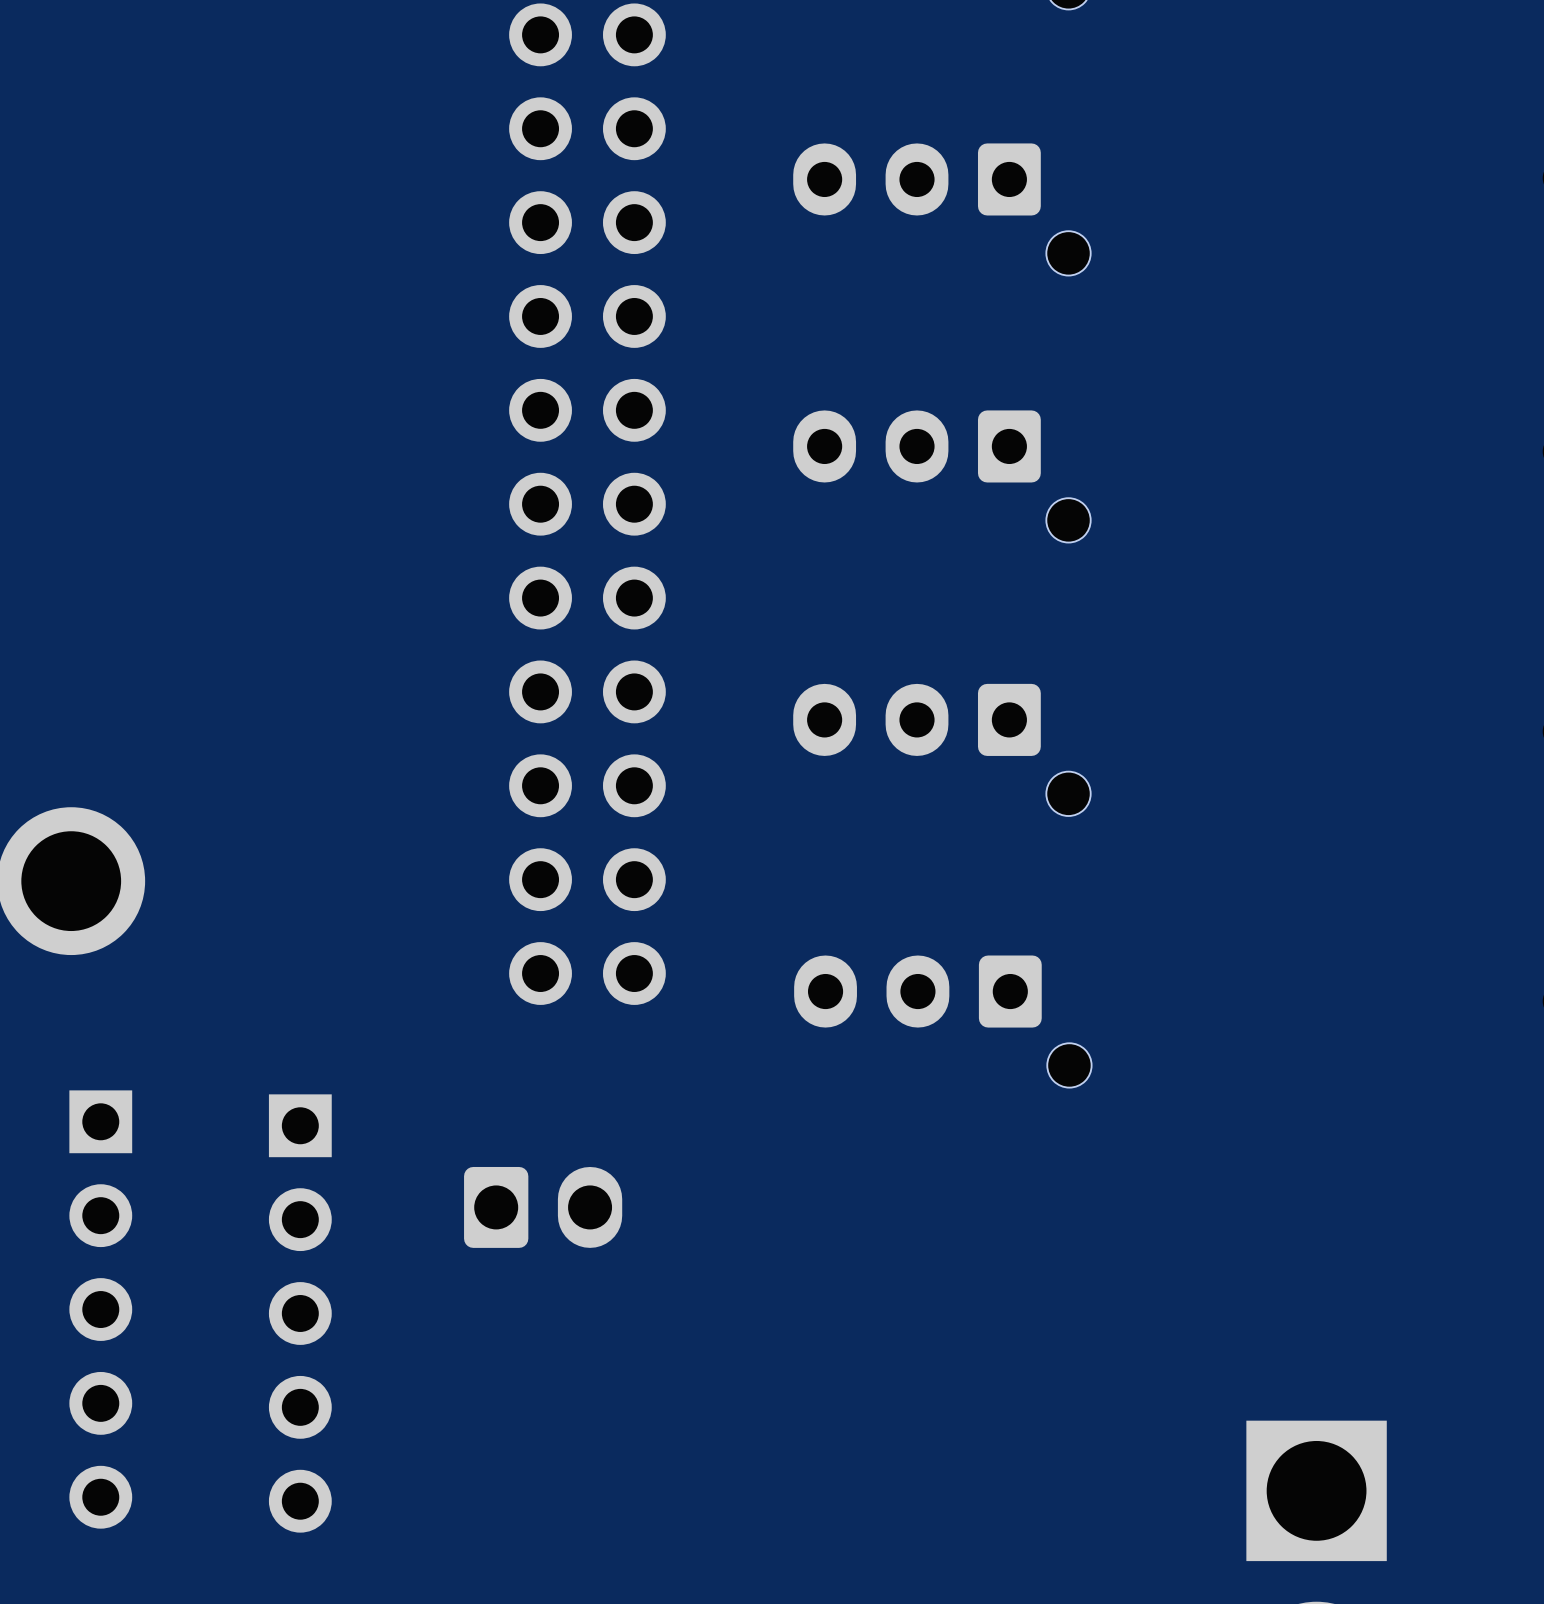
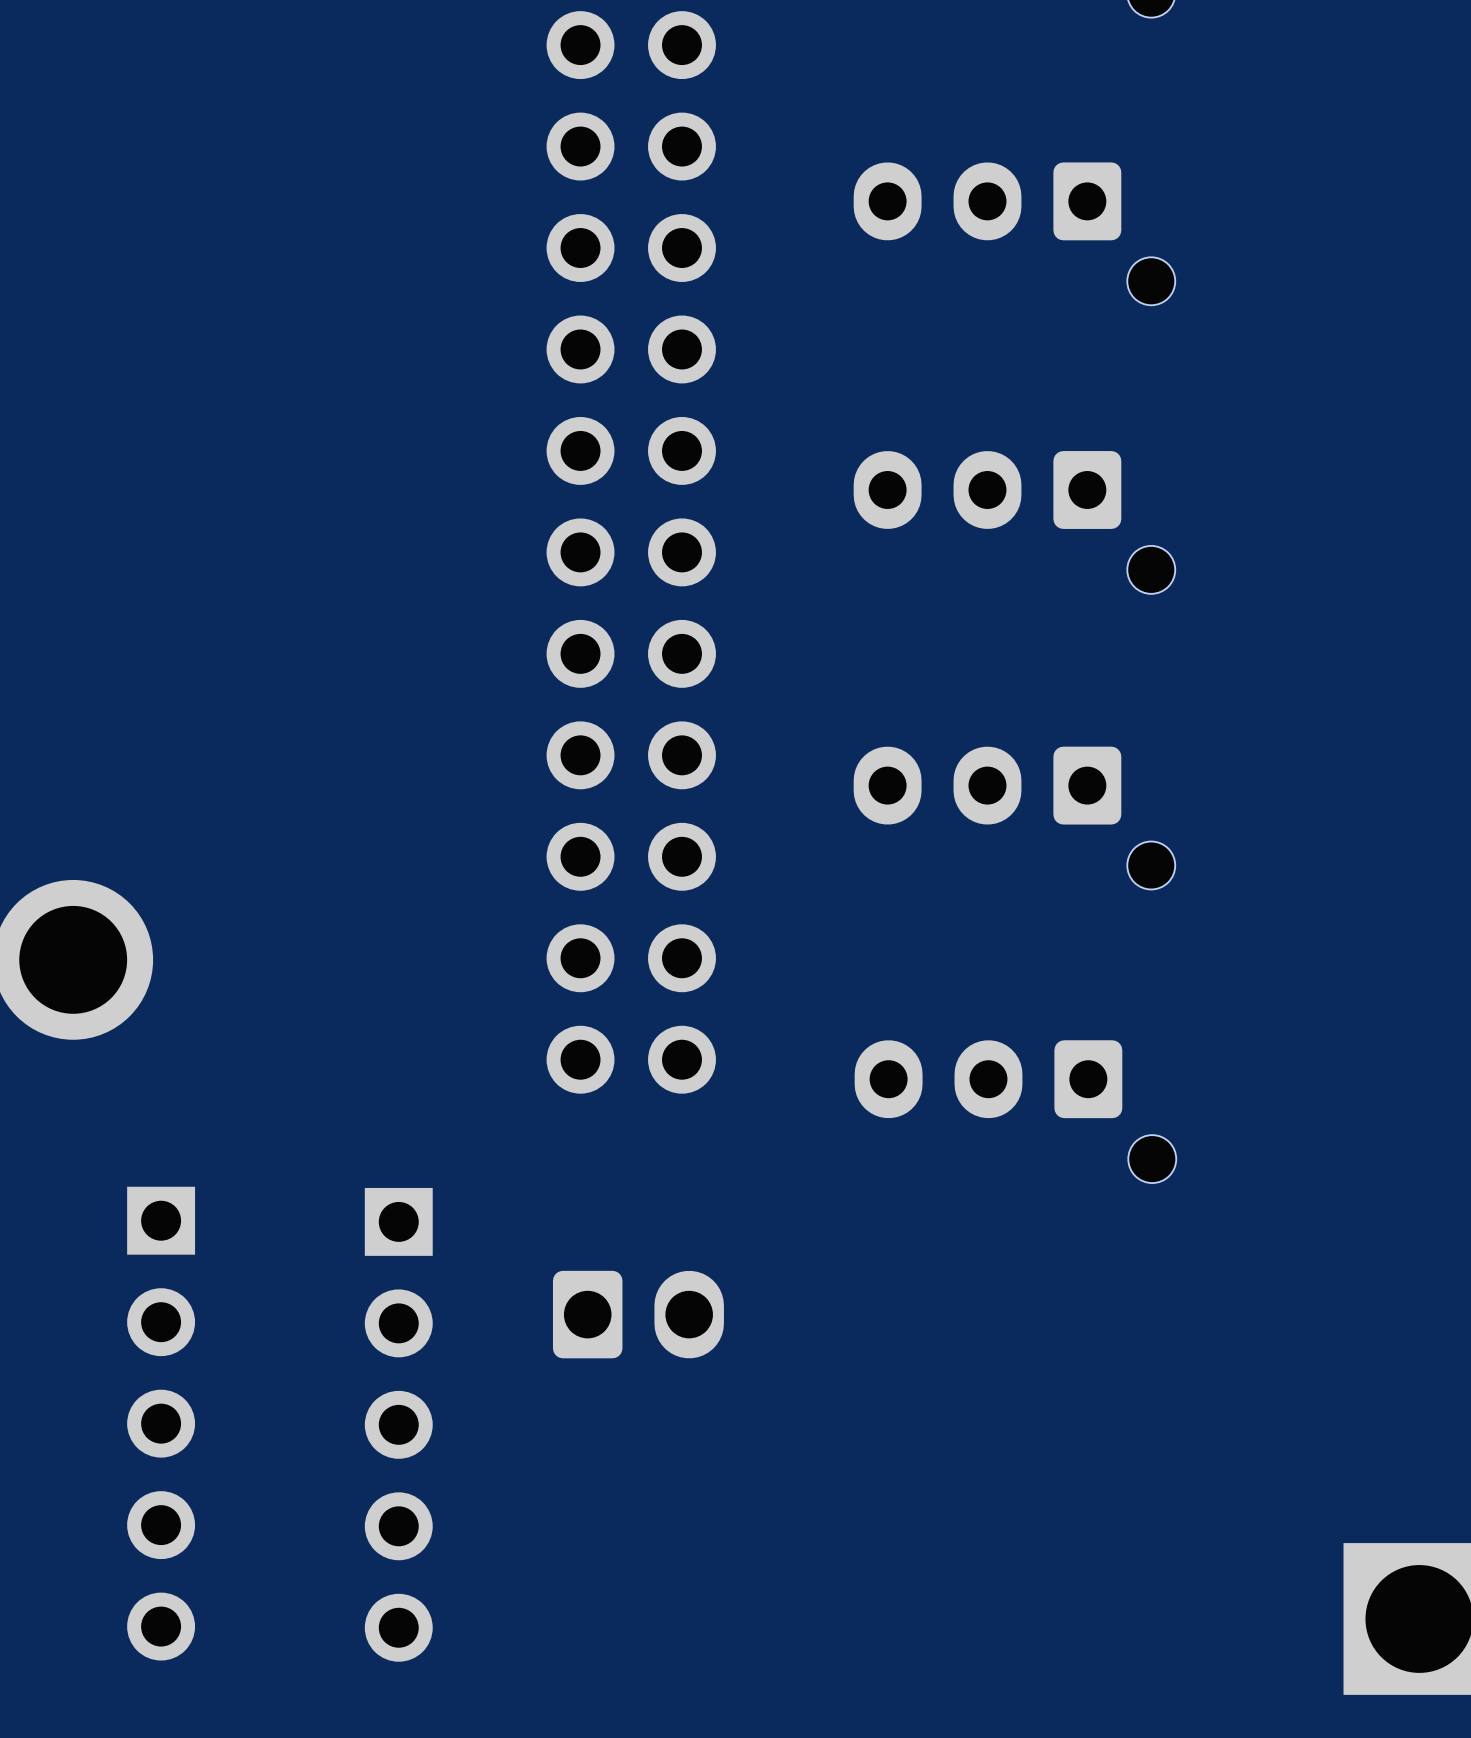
part position: (543, 1207) -> (638, 1314)
part position: (100, 1309) -> (161, 1423)
part position: (300, 1313) -> (398, 1424)

